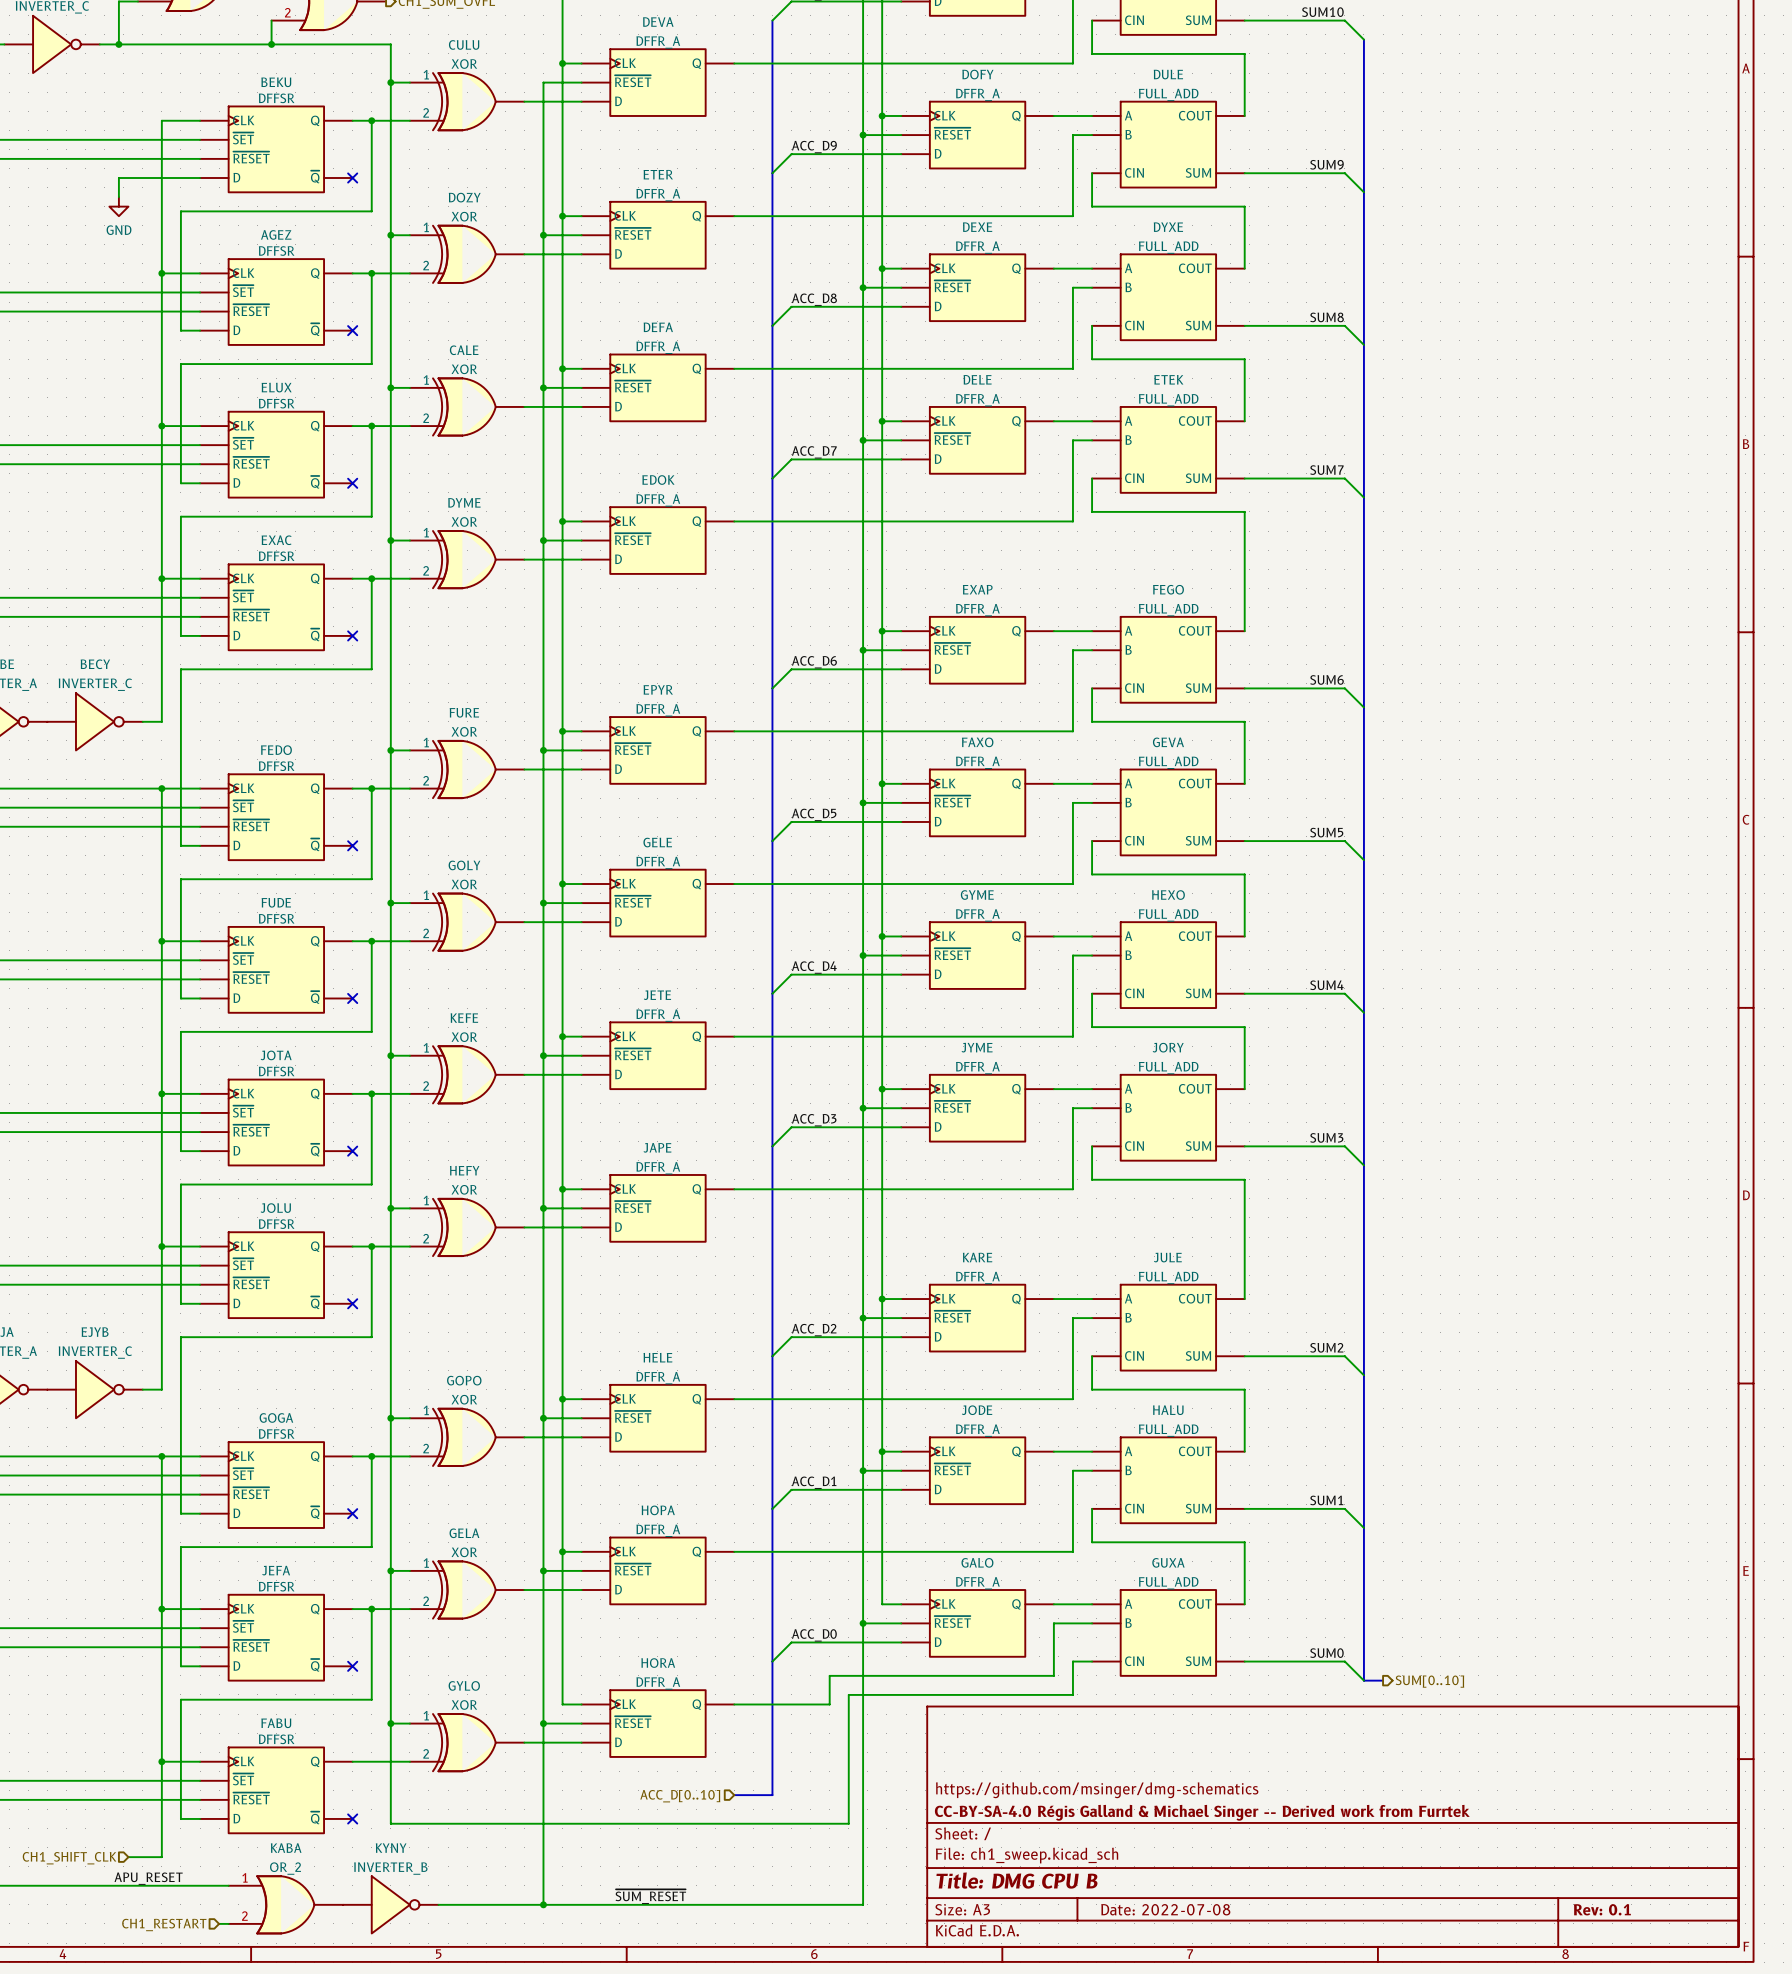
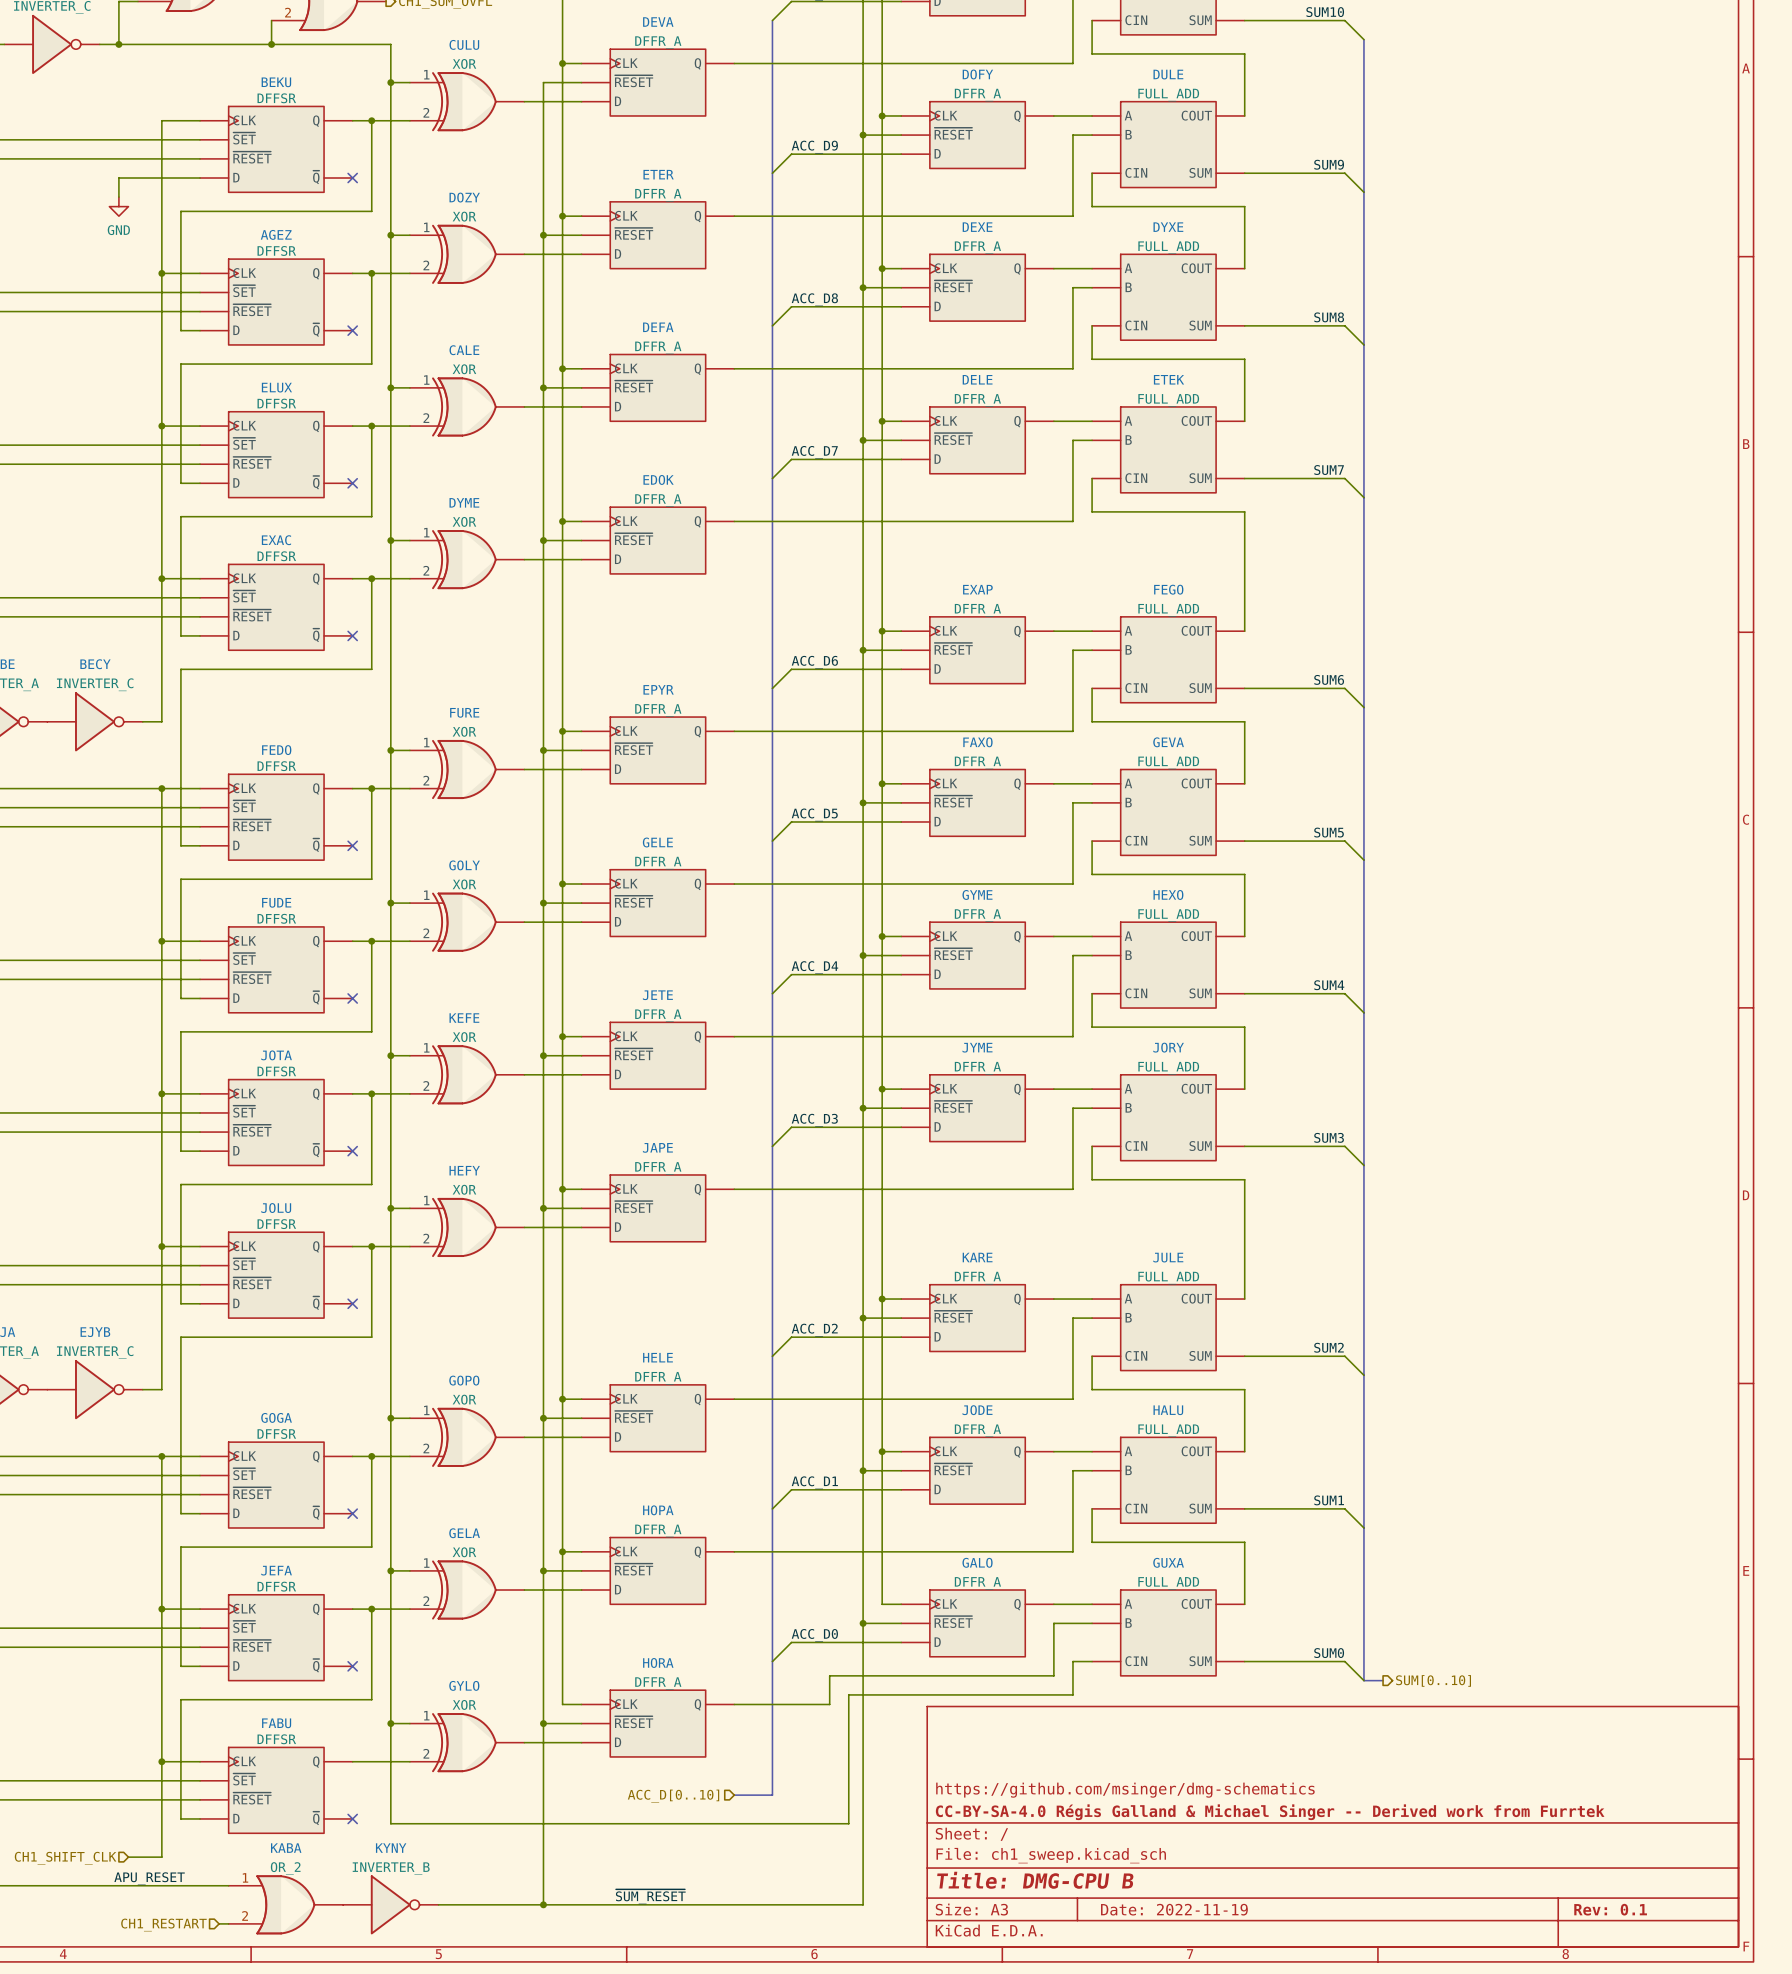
title block: Title: DMG CPU B (1016, 1880) -> Title: DMG-CPU B (1035, 1880)
title block: Date: 2022-07-08 (1165, 1909) -> Date: 2022-11-19 (1174, 1909)

